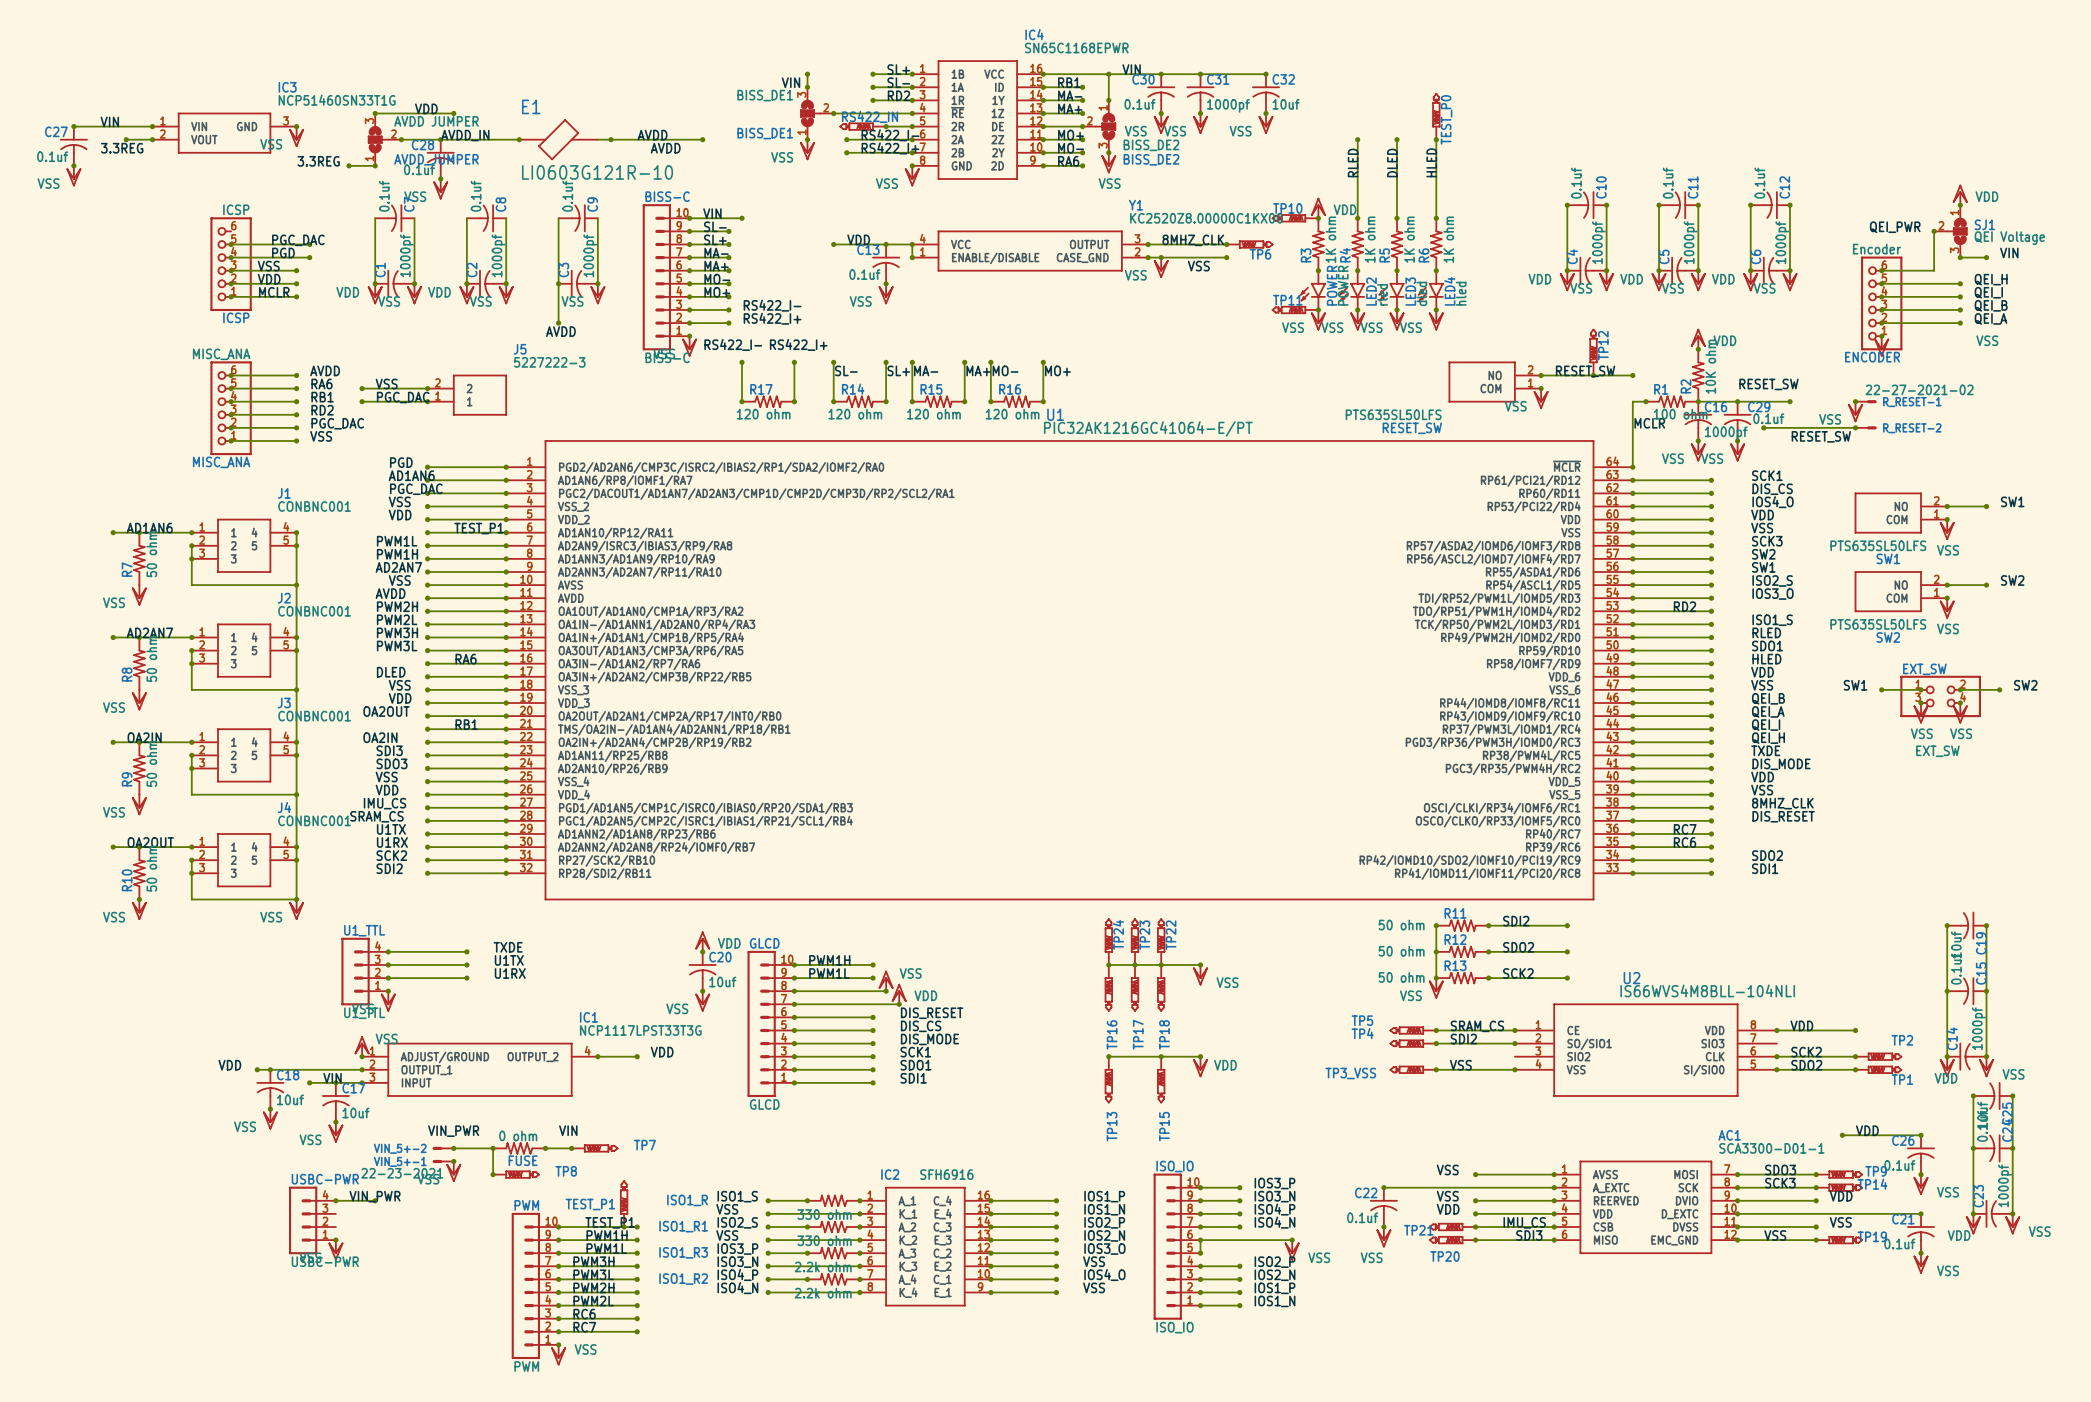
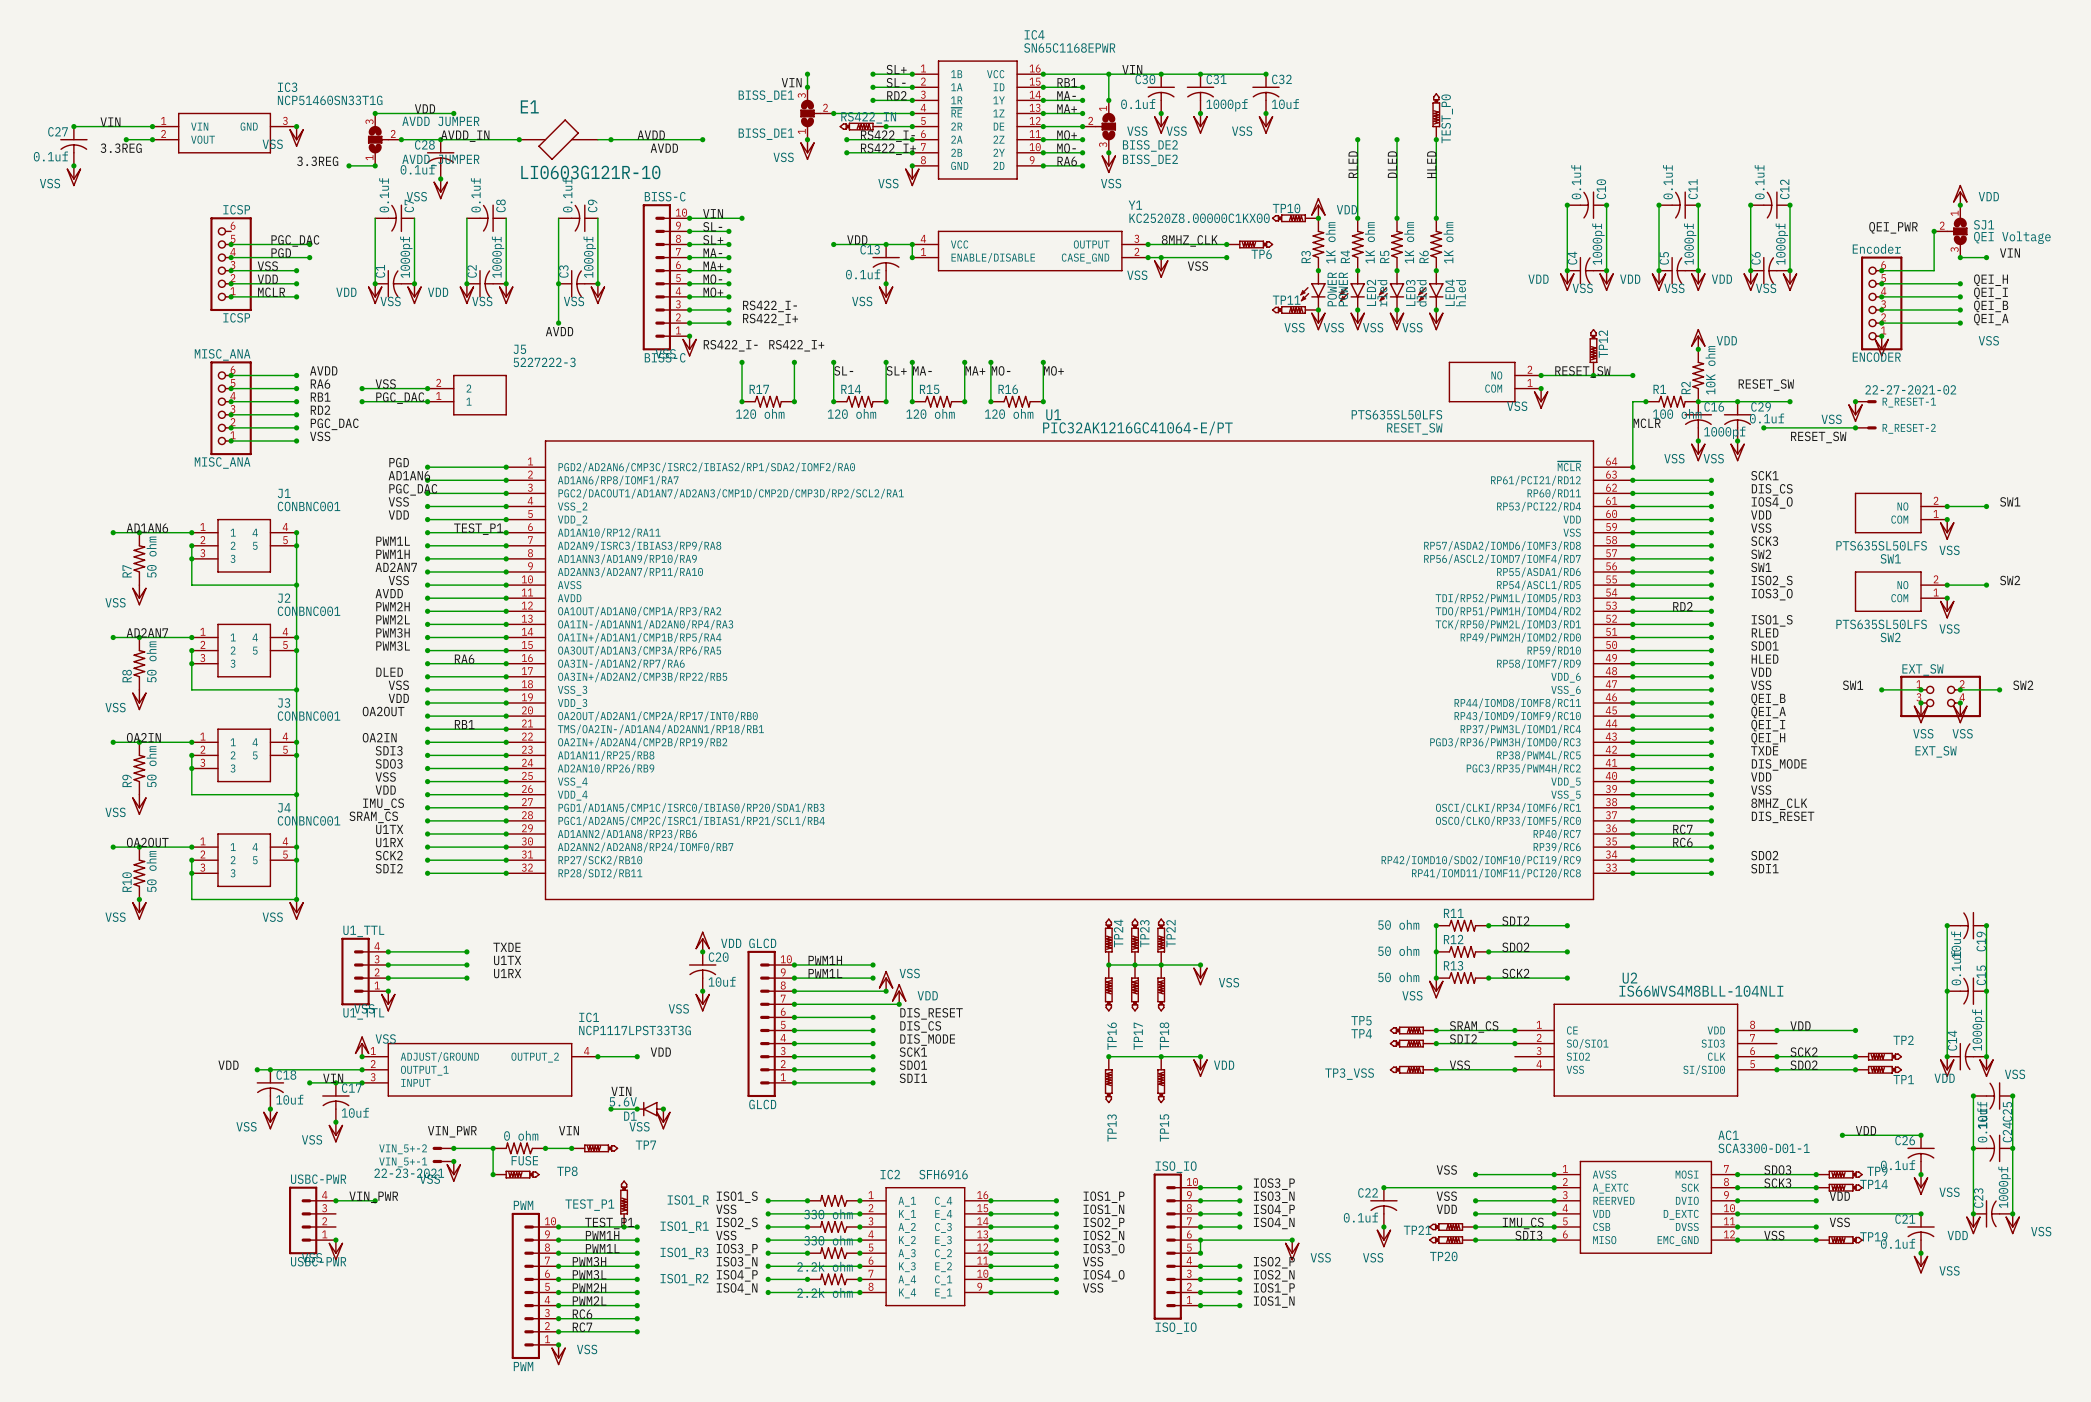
label: none -> VIN (621, 1091)
wire: none -> (611, 1109) (637, 1109)
junction: none -> (611, 1109)
junction: none -> (637, 1109)
D1: none -> 5.6V (650, 1109)
junction: none -> (663, 1109)
power symbol: none -> VSS (663, 1119)

